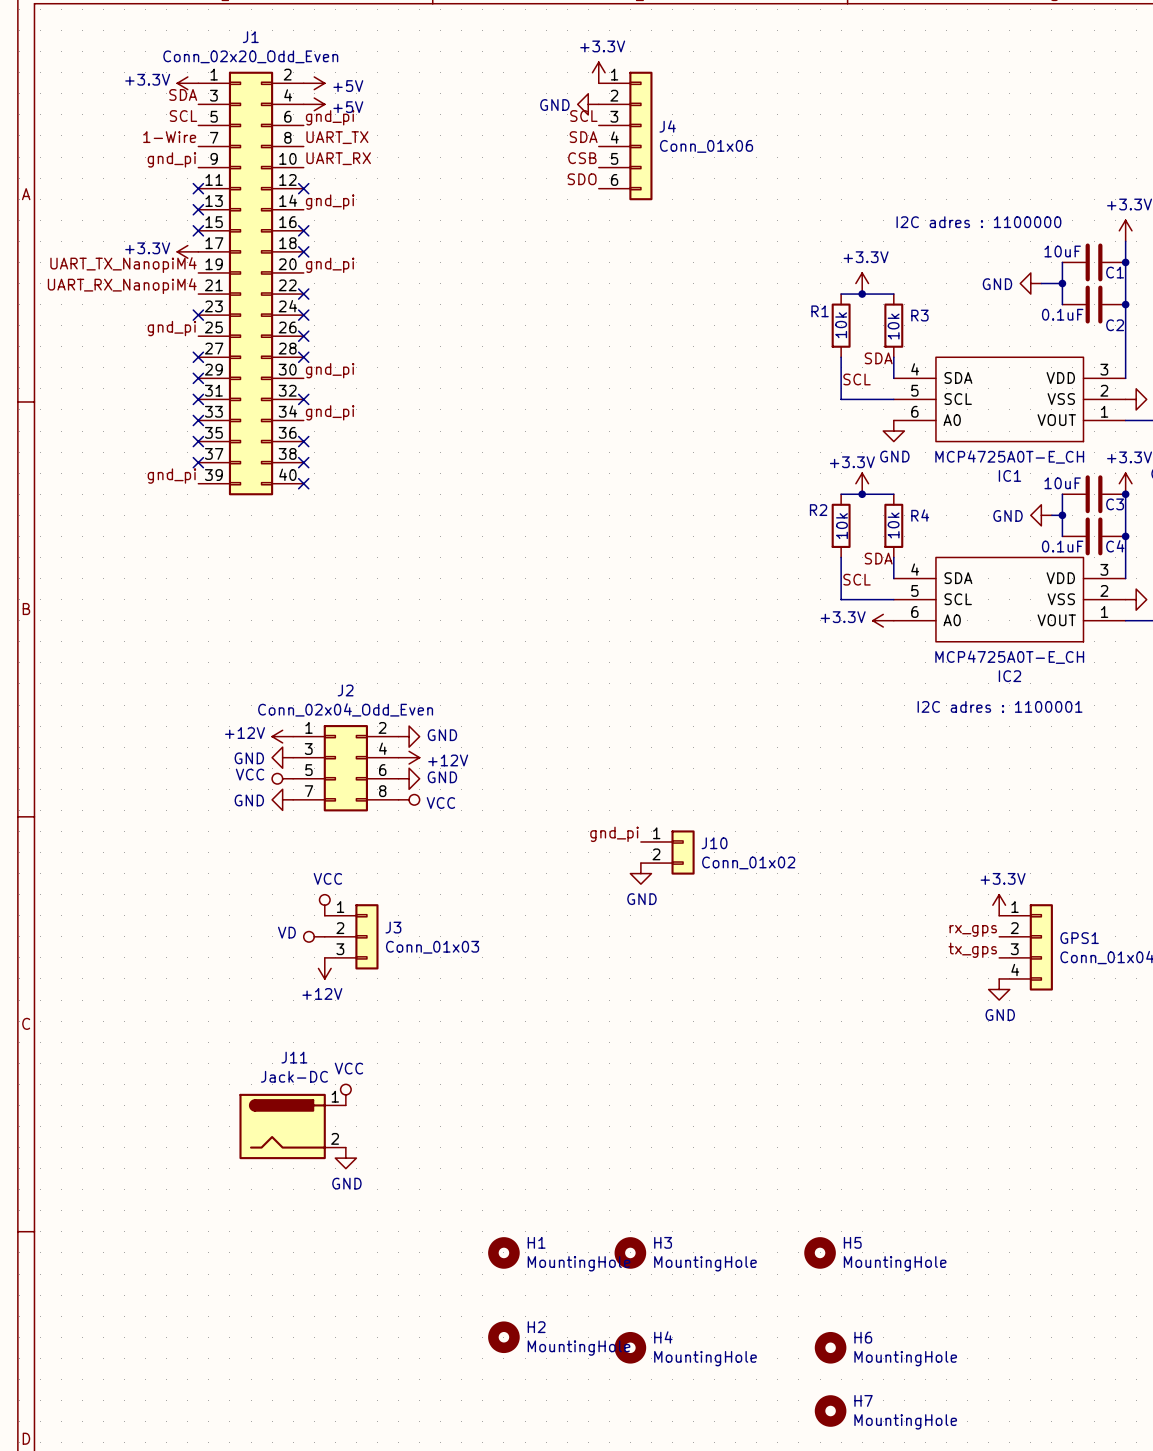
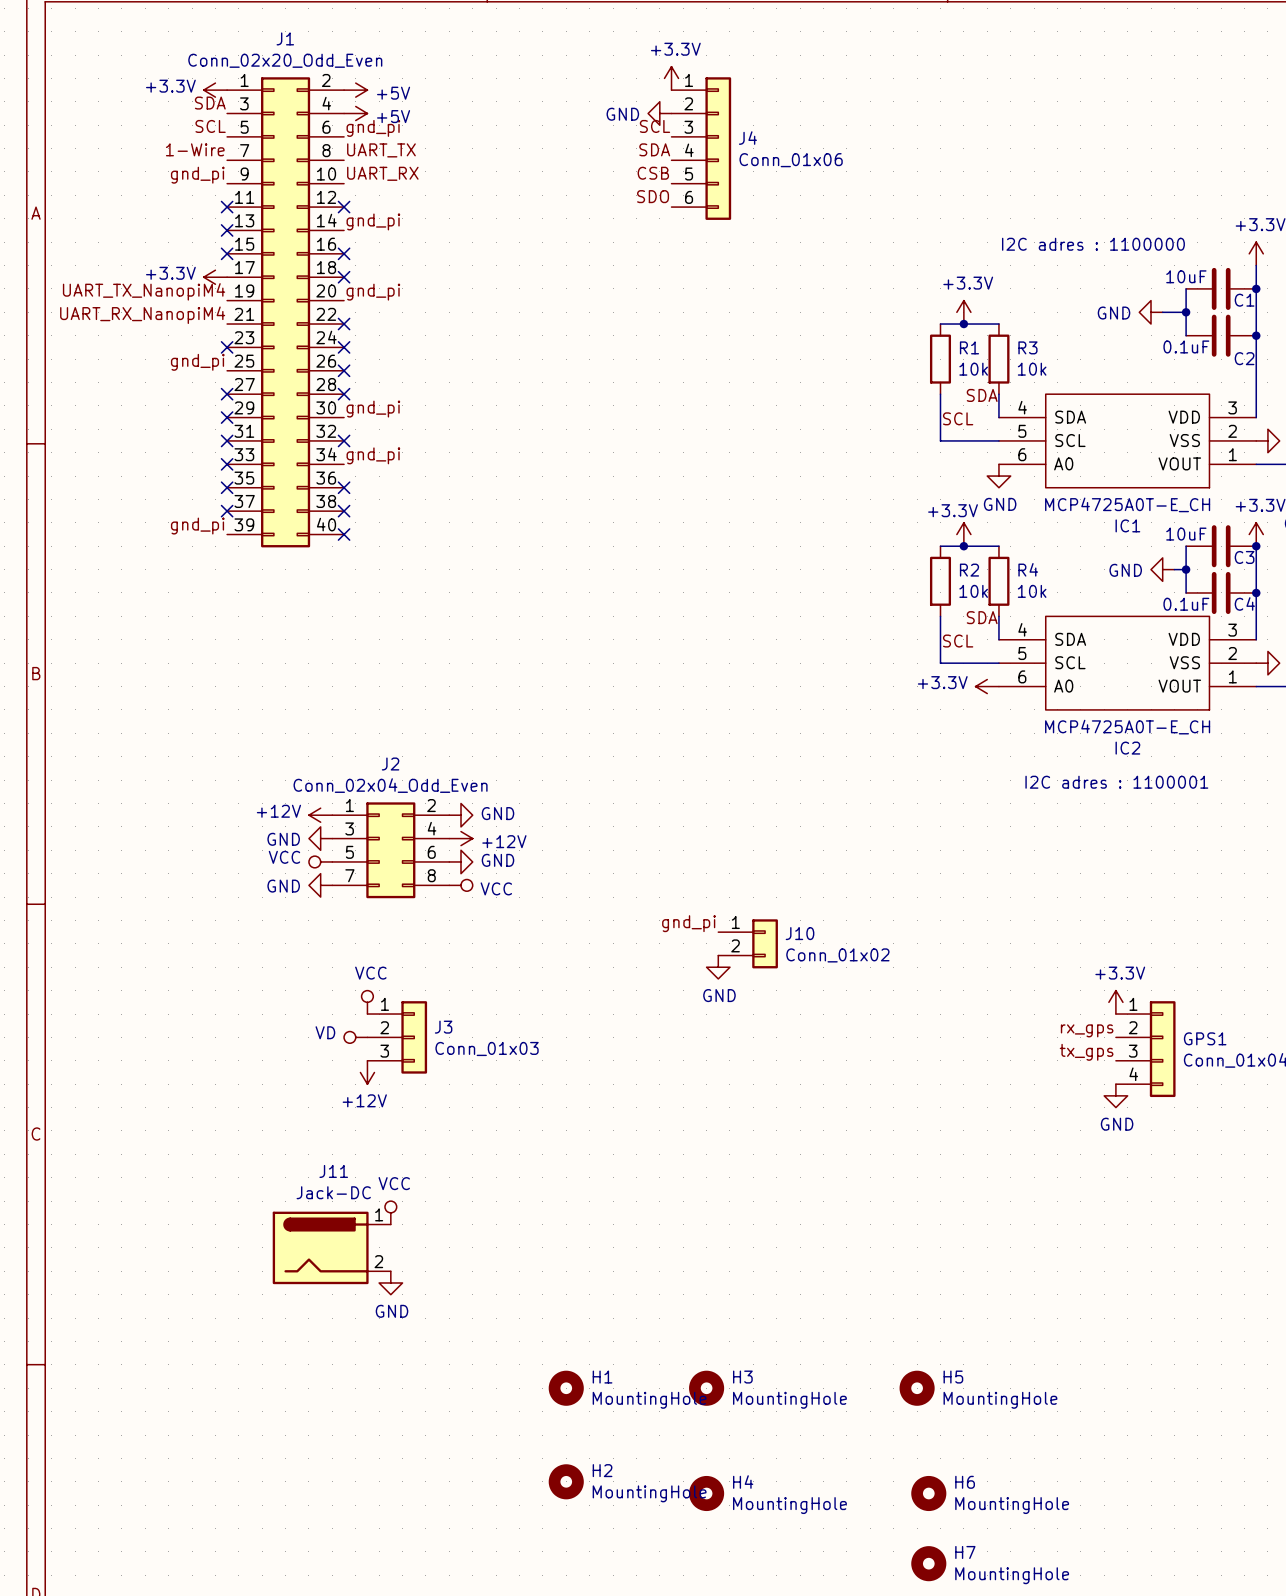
R1 name position: R1 (820, 311) -> R1 (969, 347)
R1 value rotation: 0° (841, 325) -> 90° clockwise (973, 369)
R3 value rotation: 0° (893, 326) -> 90° clockwise (1032, 369)
R2 name position: R2 (818, 510) -> R2 (969, 570)
R4 value rotation: 0° (893, 525) -> 90° clockwise (1032, 591)
R2 value rotation: 0° (841, 526) -> 90° clockwise (973, 591)

